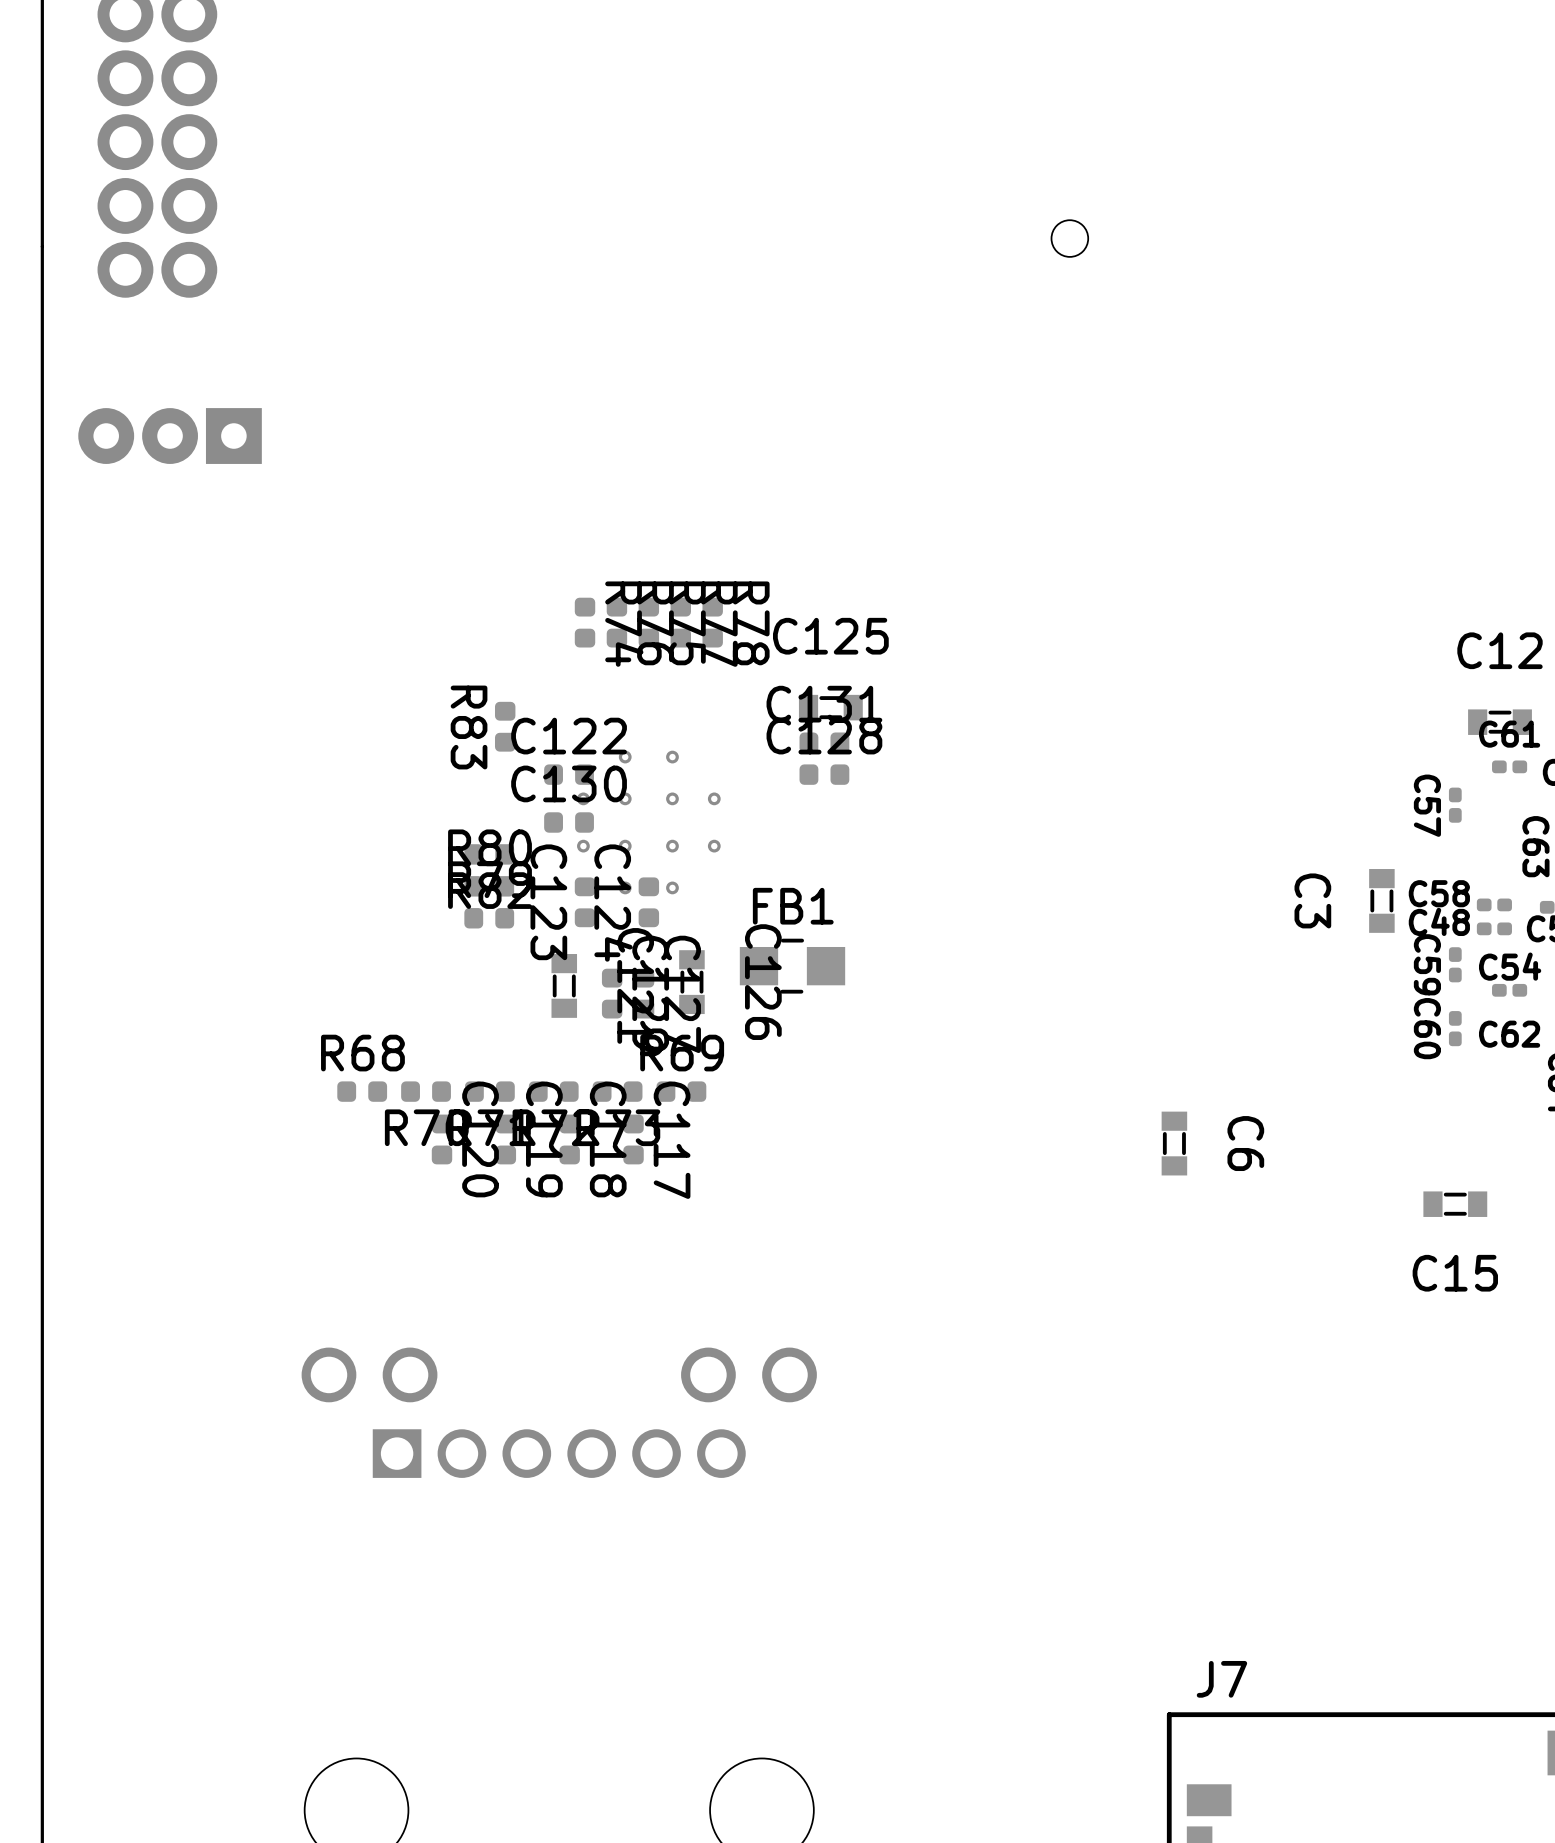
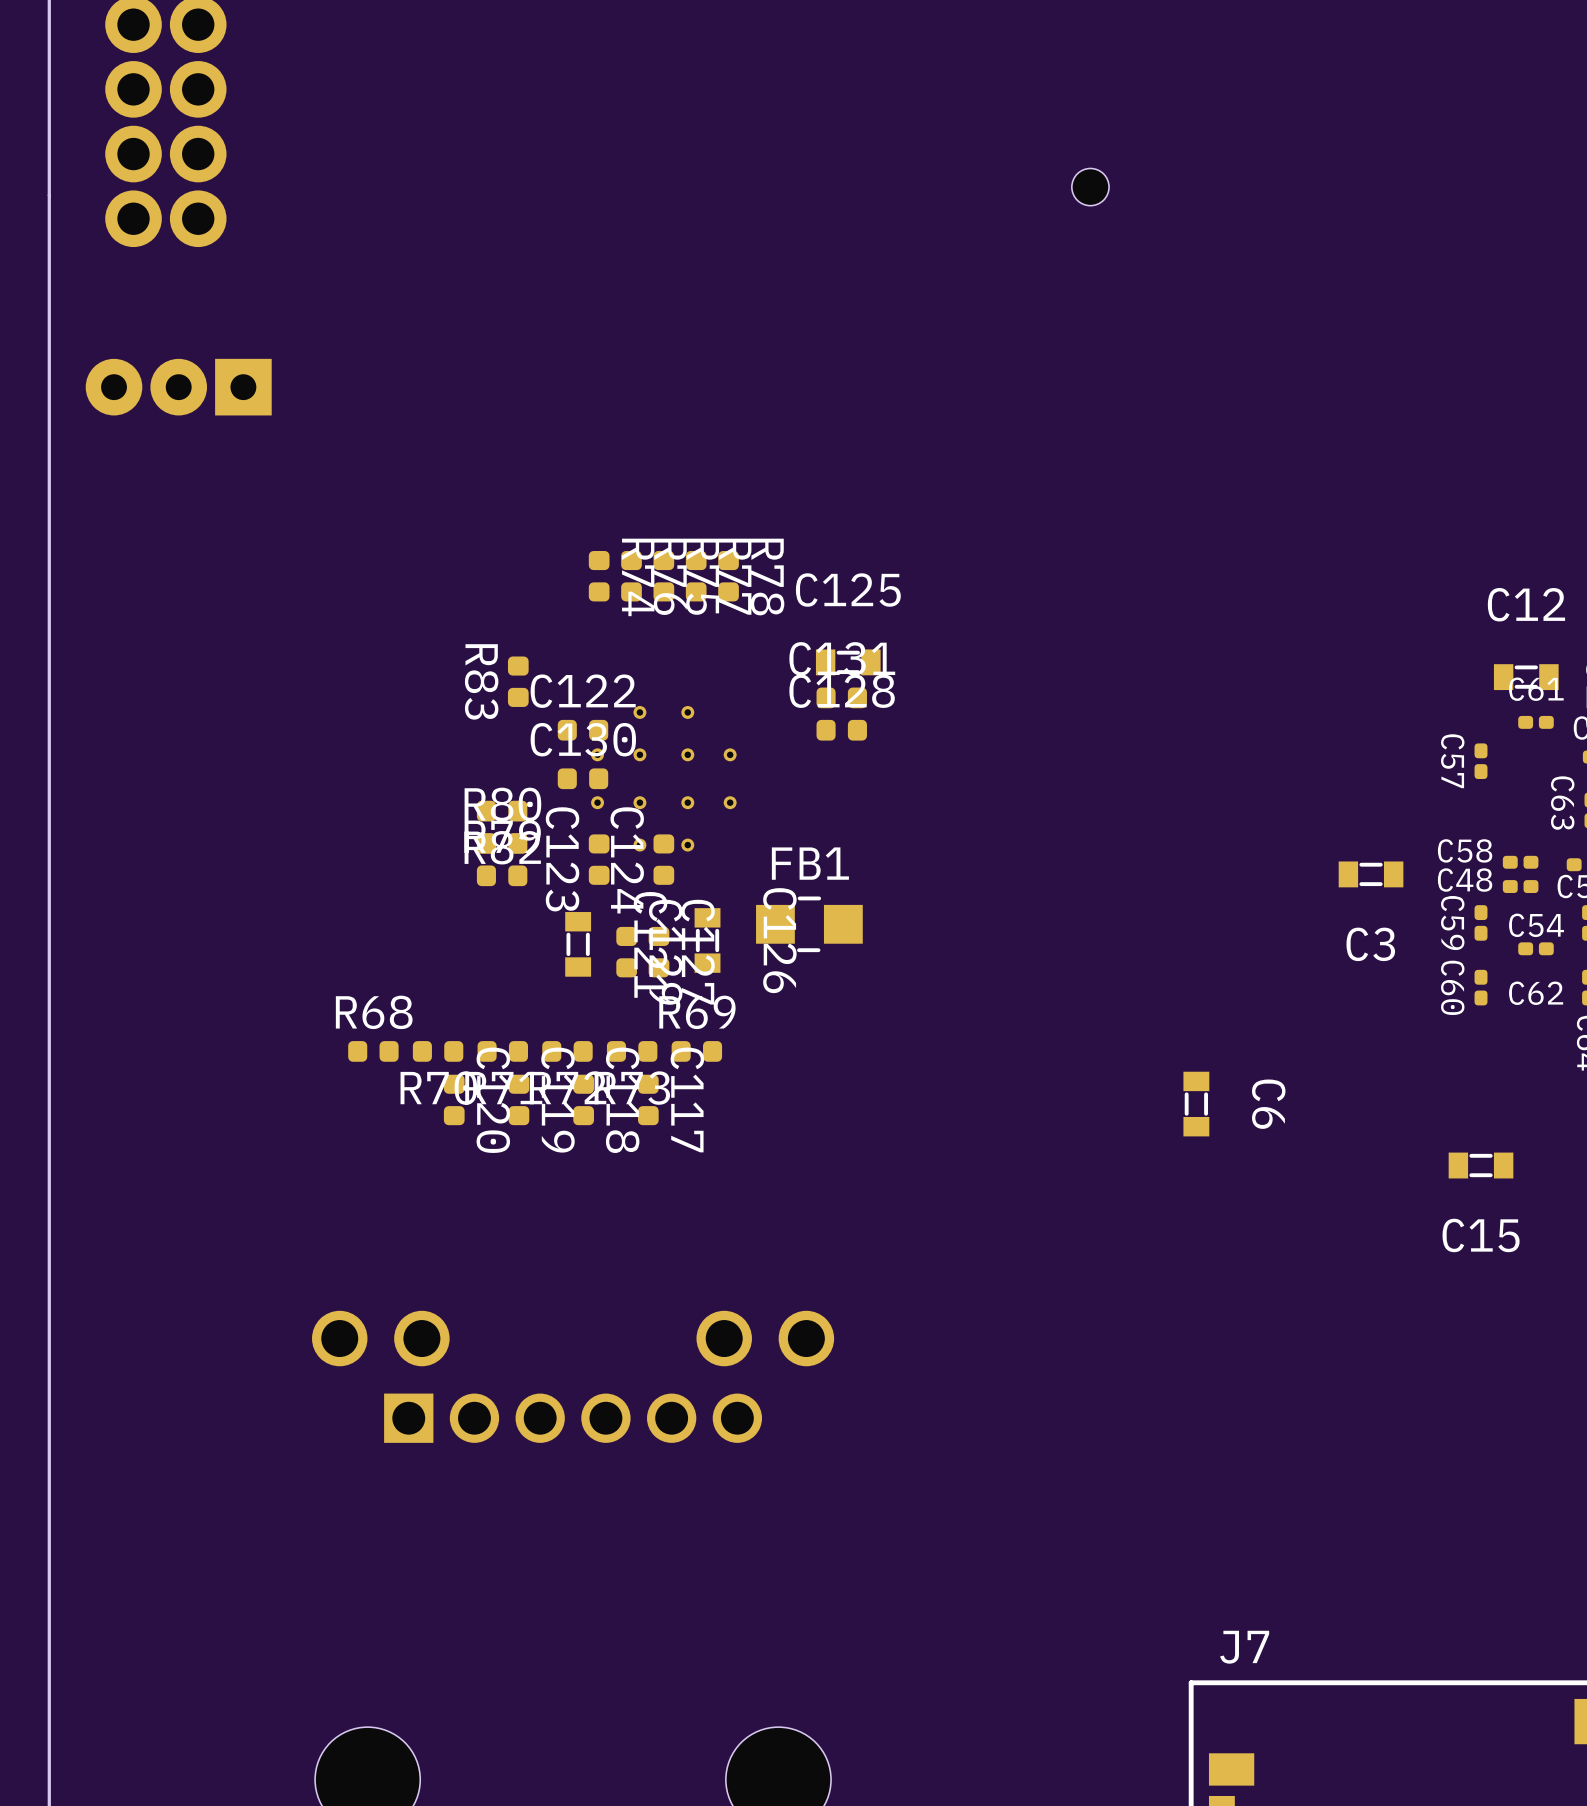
C3 name position: C3 (1312, 900) -> C3 (1370, 944)
C3 rotation: 0° (1381, 900) -> 90° clockwise (1371, 874)
C3 position: (1381, 900) -> (1371, 874)

